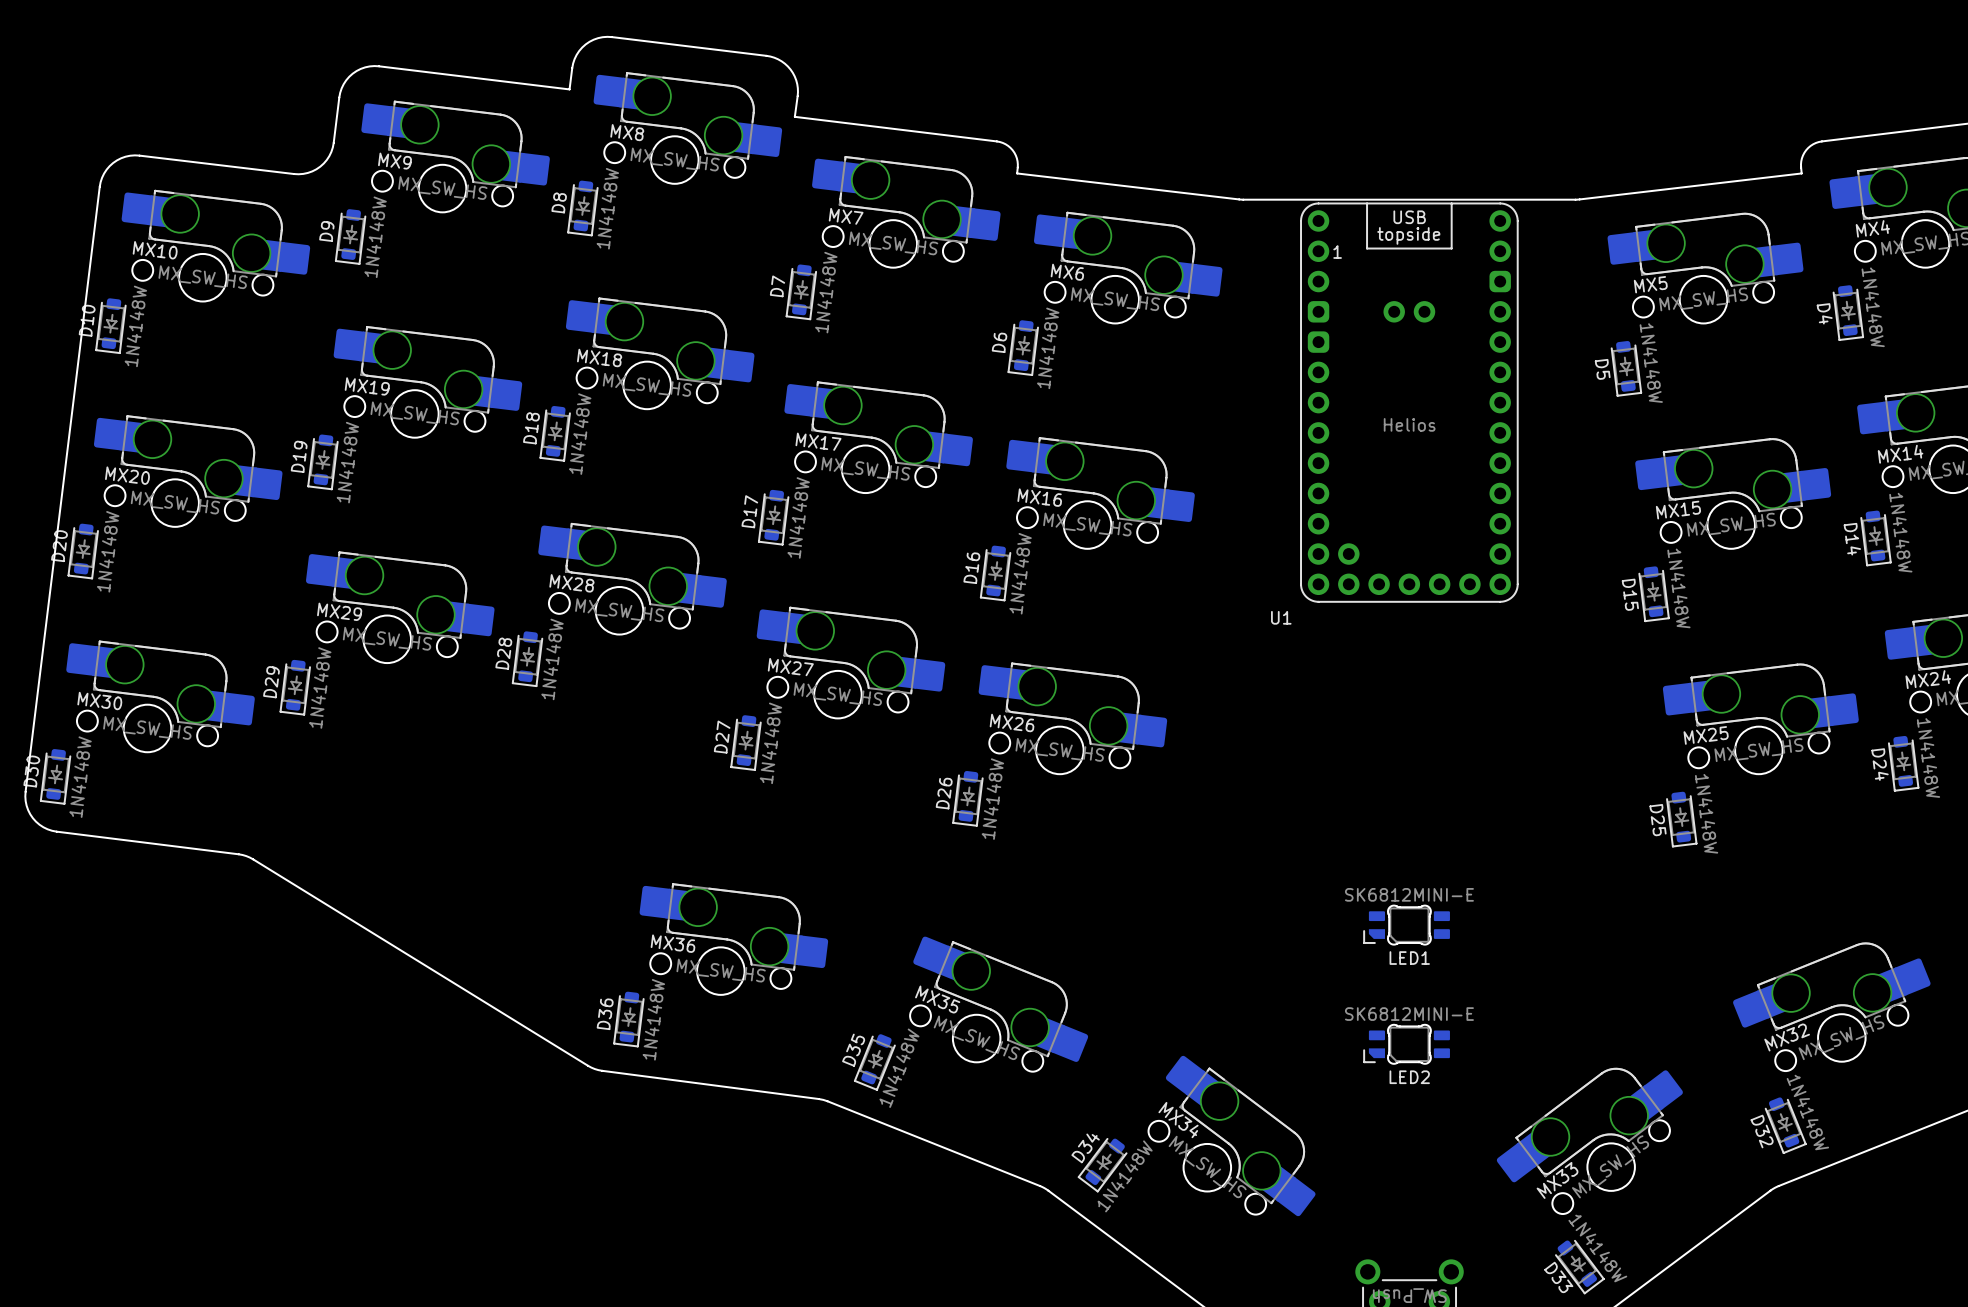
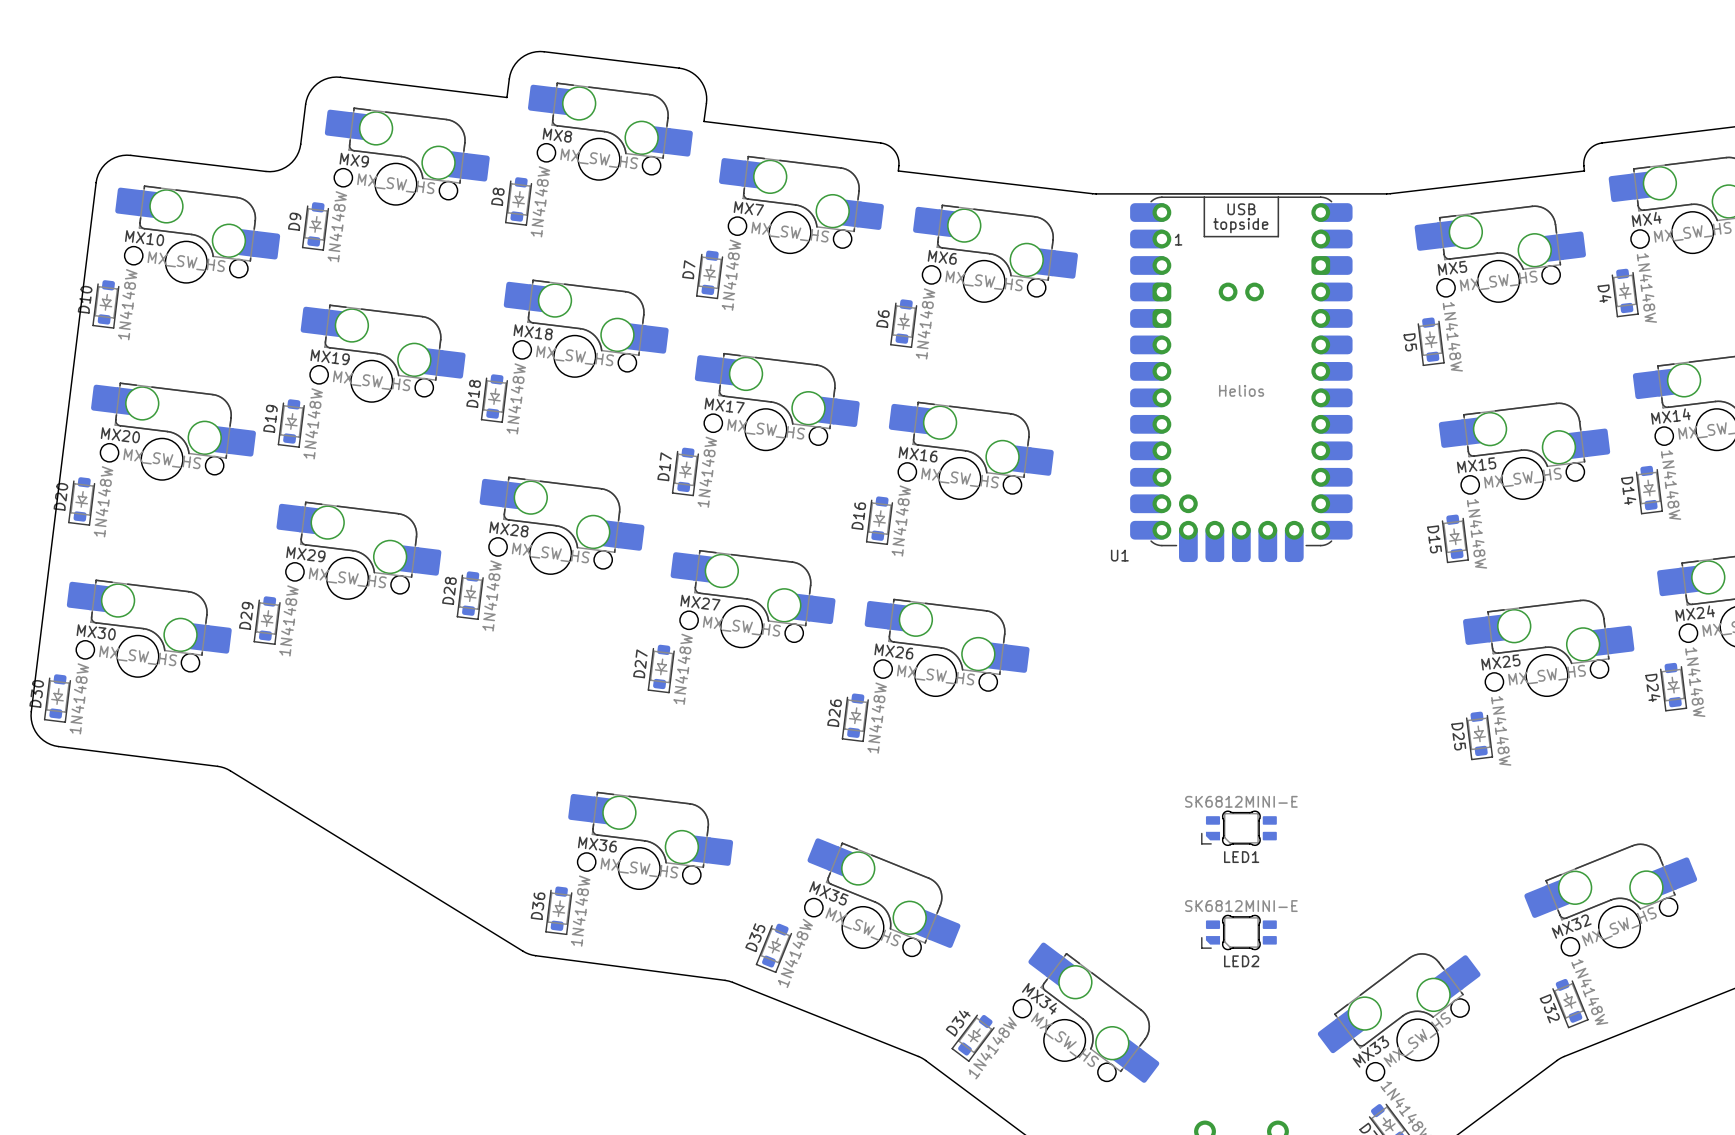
U1 footprint: [1300, 202, 1519, 603] -> [1130, 196, 1353, 563]

